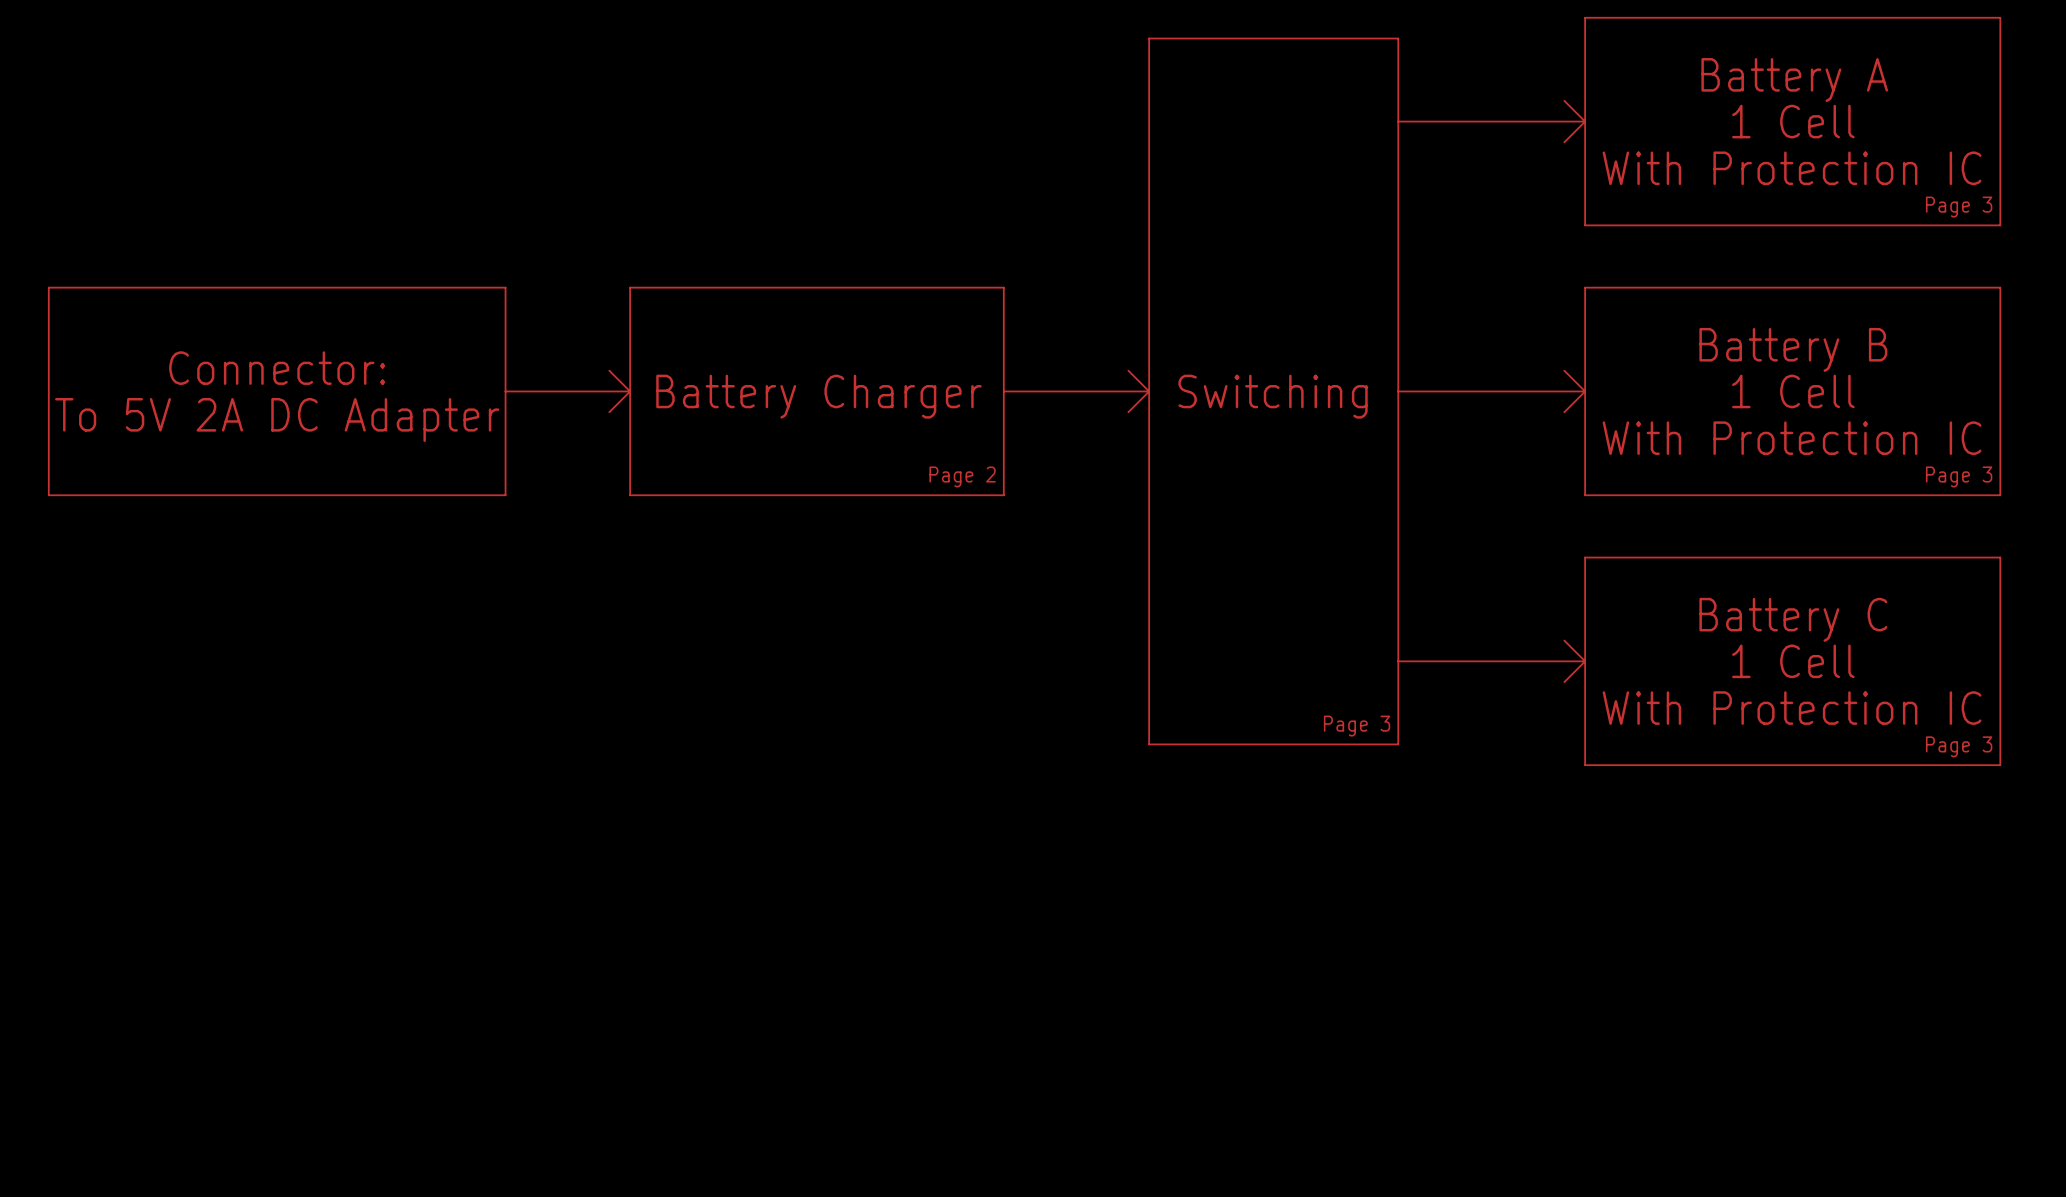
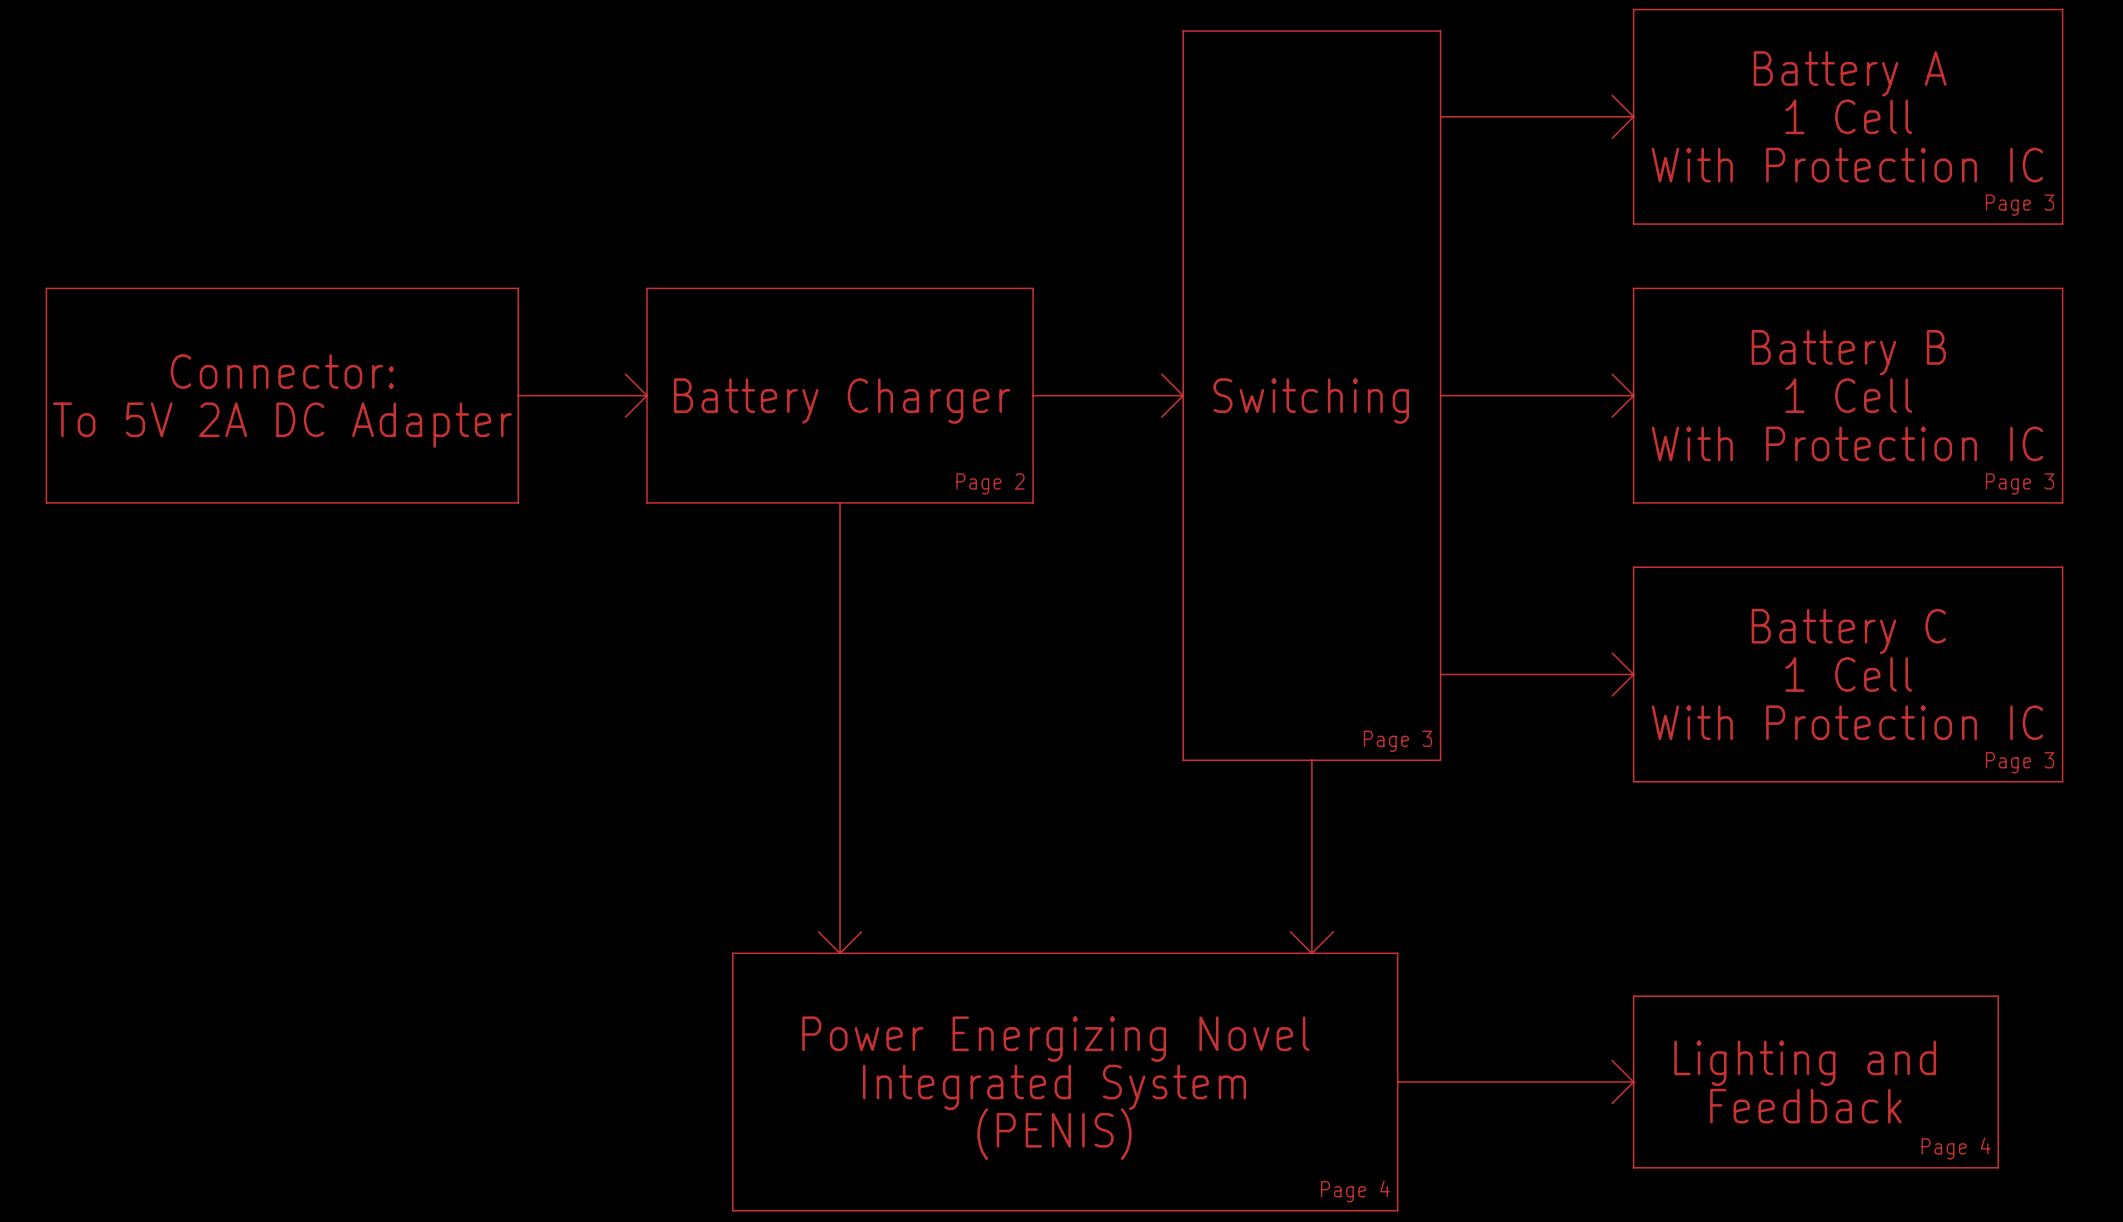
line: none -> (840, 502) (840, 953)
line: none -> (1311, 760) (1311, 953)
line: none -> (818, 931) (840, 953)
line: none -> (861, 931) (840, 953)
line: none -> (1290, 931) (1311, 953)
line: none -> (1333, 931) (1311, 953)
line: none -> (732, 953) (1397, 953) (1397, 1210) (732, 1210) (732, 953)
line: none -> (1633, 996) (1633, 1167) (1998, 1167) (1998, 996) (1633, 996)
text: none -> Power Energizing Novel (1055, 1039)
line: none -> (1612, 1060) (1633, 1082)
text: none -> Lighting and (1805, 1063)
line: none -> (1397, 1082) (1633, 1082)
line: none -> (1633, 1082) (1612, 1103)
text: none -> Integrated System (1054, 1087)
text: none -> Feedback (1805, 1106)
text: none -> (PENIS) (1054, 1134)
text: none -> Page 4 (1955, 1148)
text: none -> Page 4 (1355, 1191)

